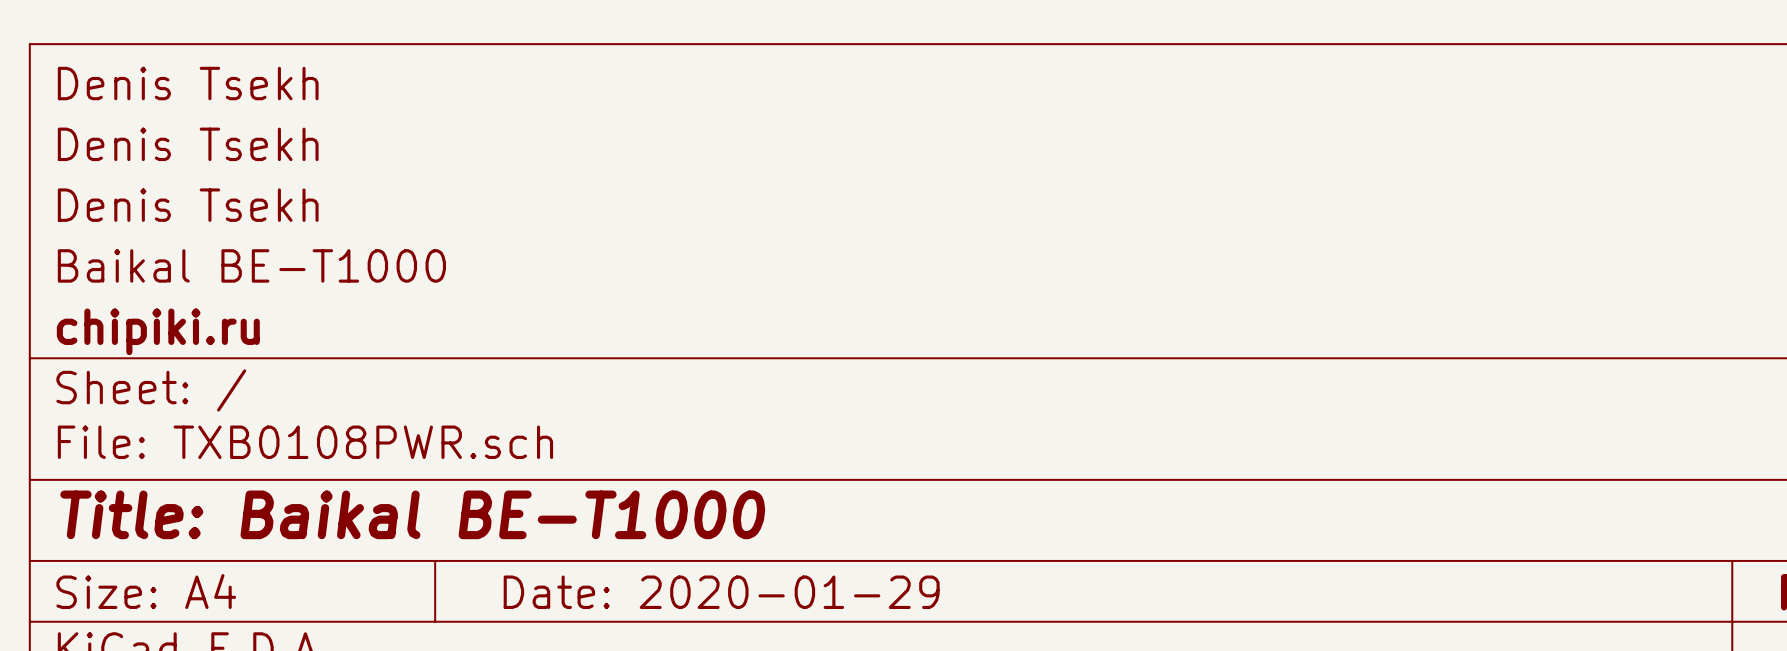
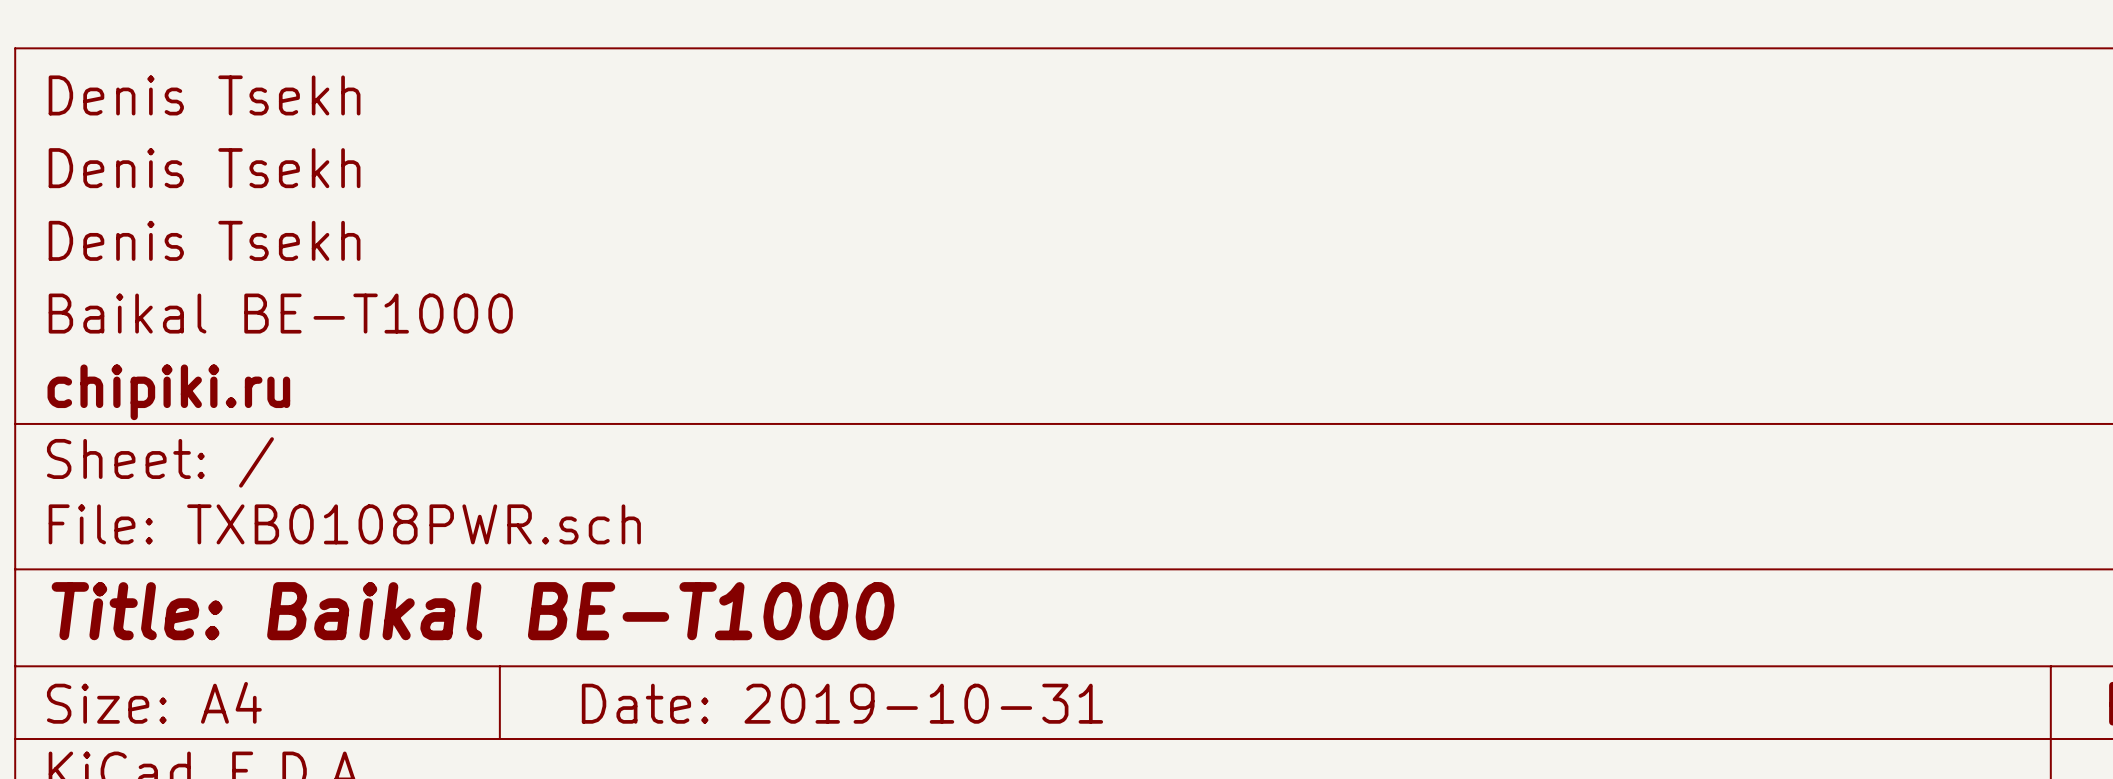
title block: Date: 2020-01-29 (721, 592) -> Date: 2019-10-31 (842, 703)

